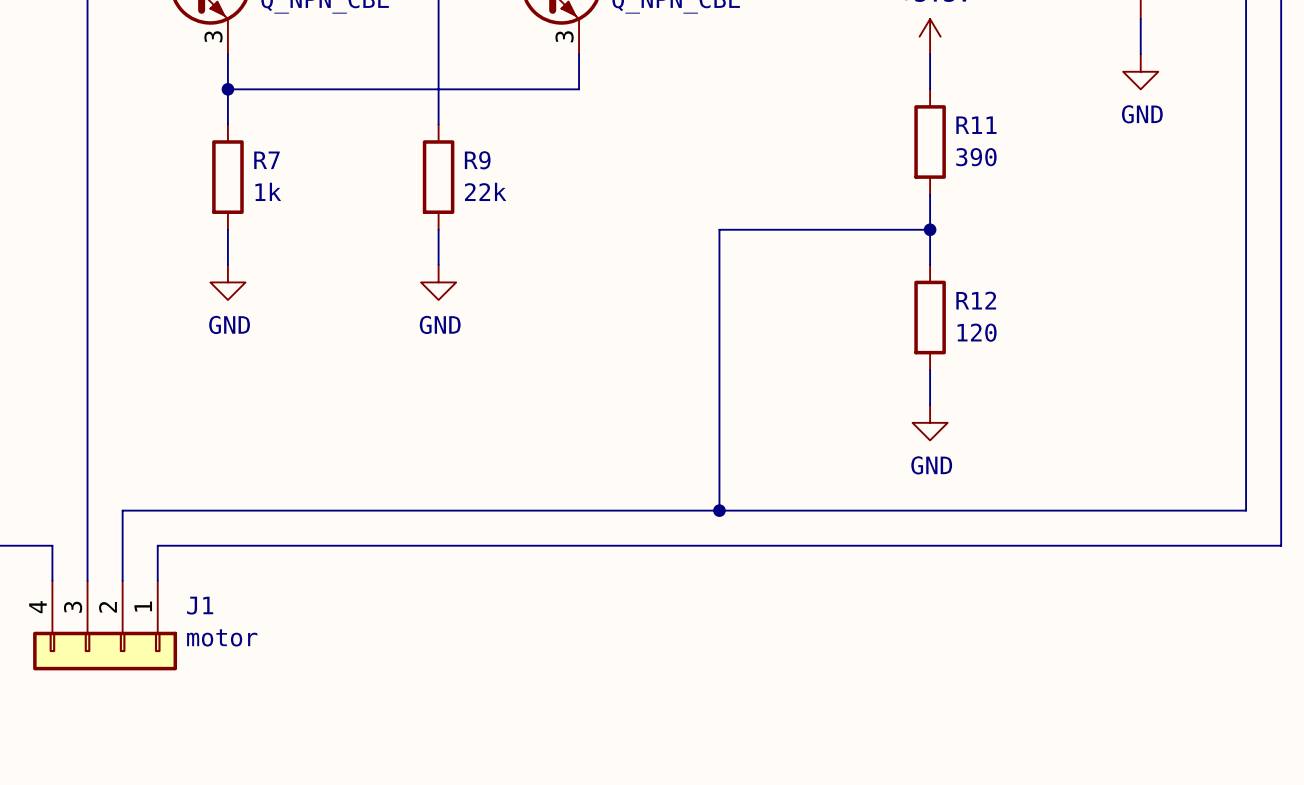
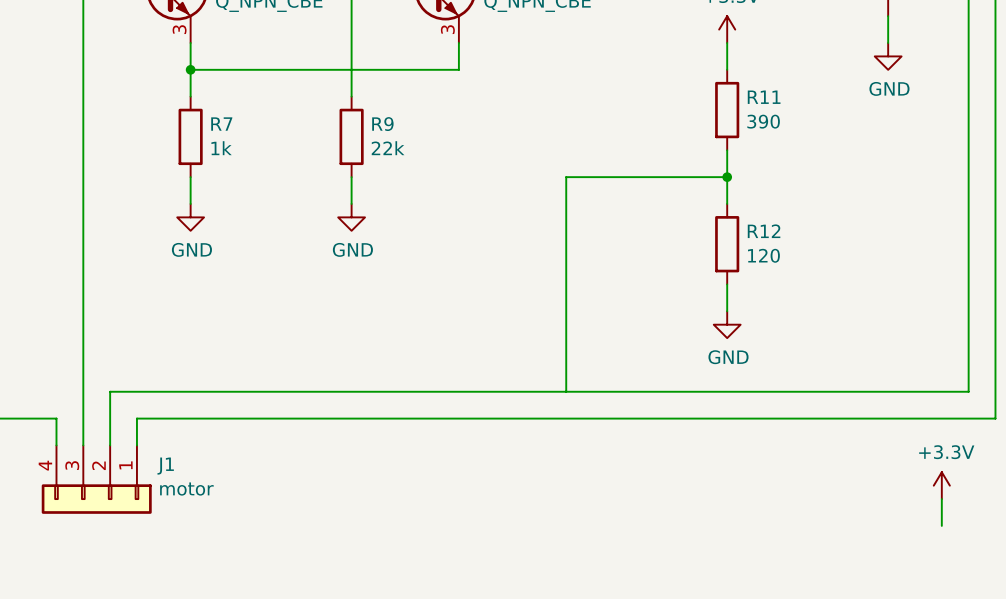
junction: (719, 510) -> none
power symbol: none -> +3.3V (941, 485)
wire: none -> (941, 499) (941, 525)

